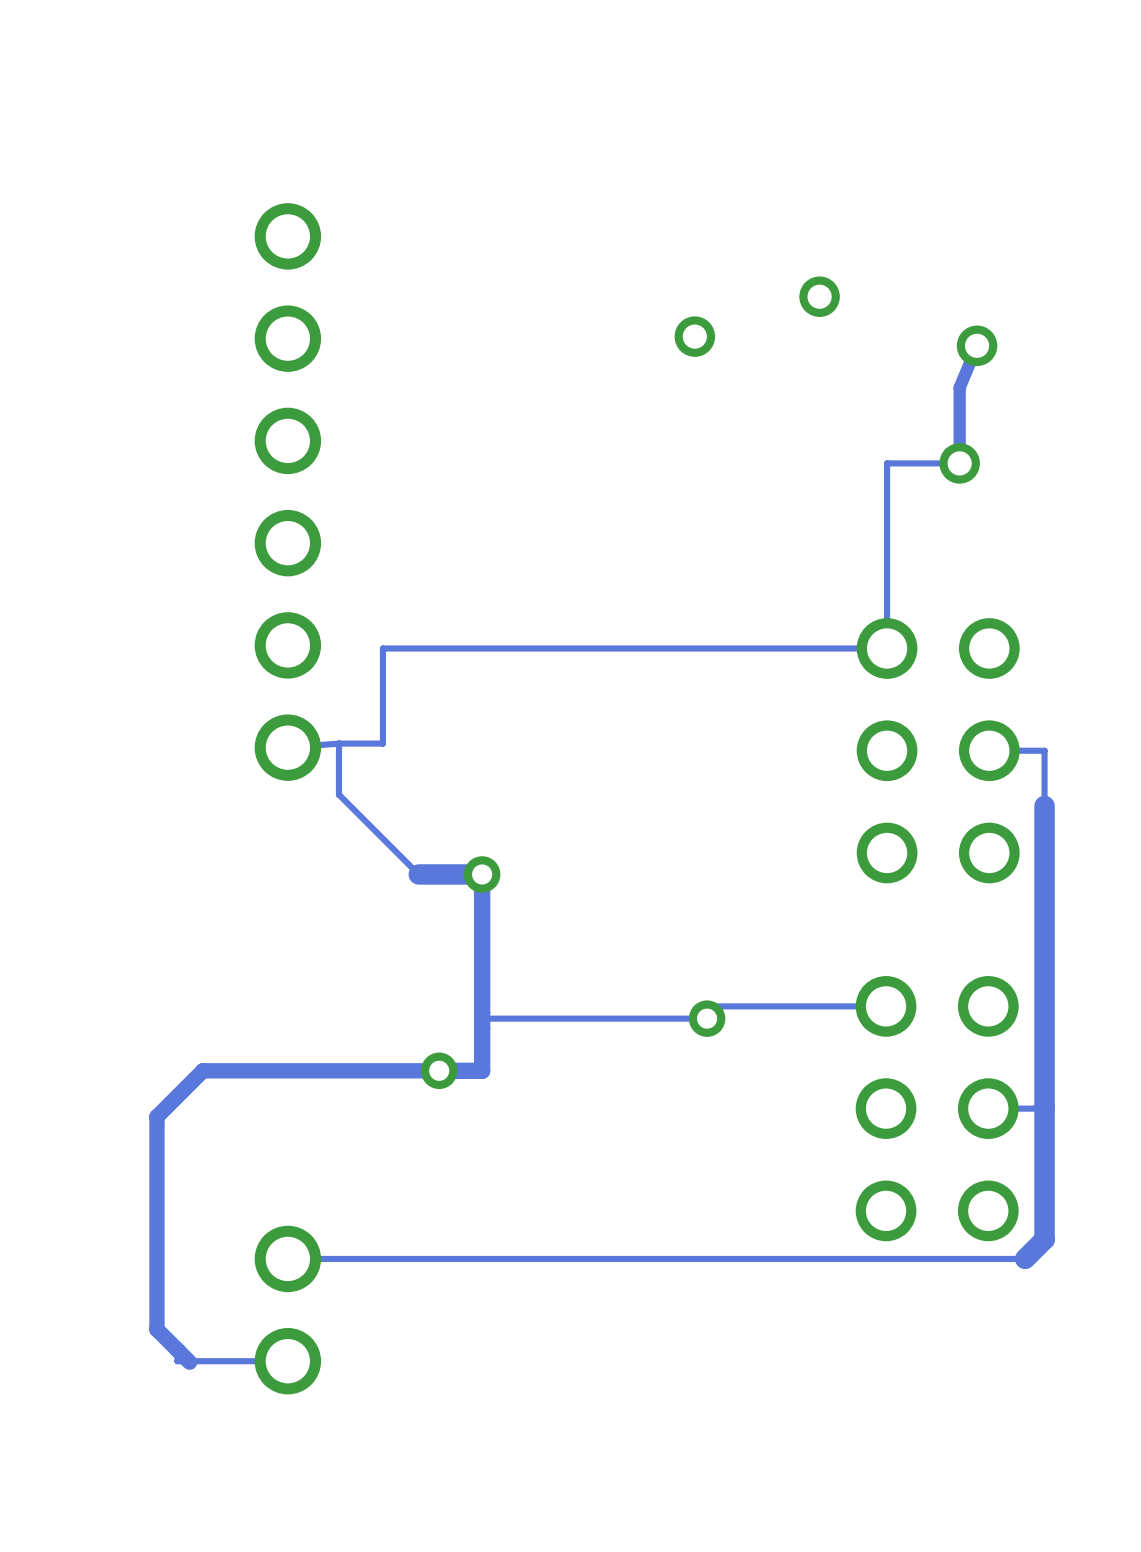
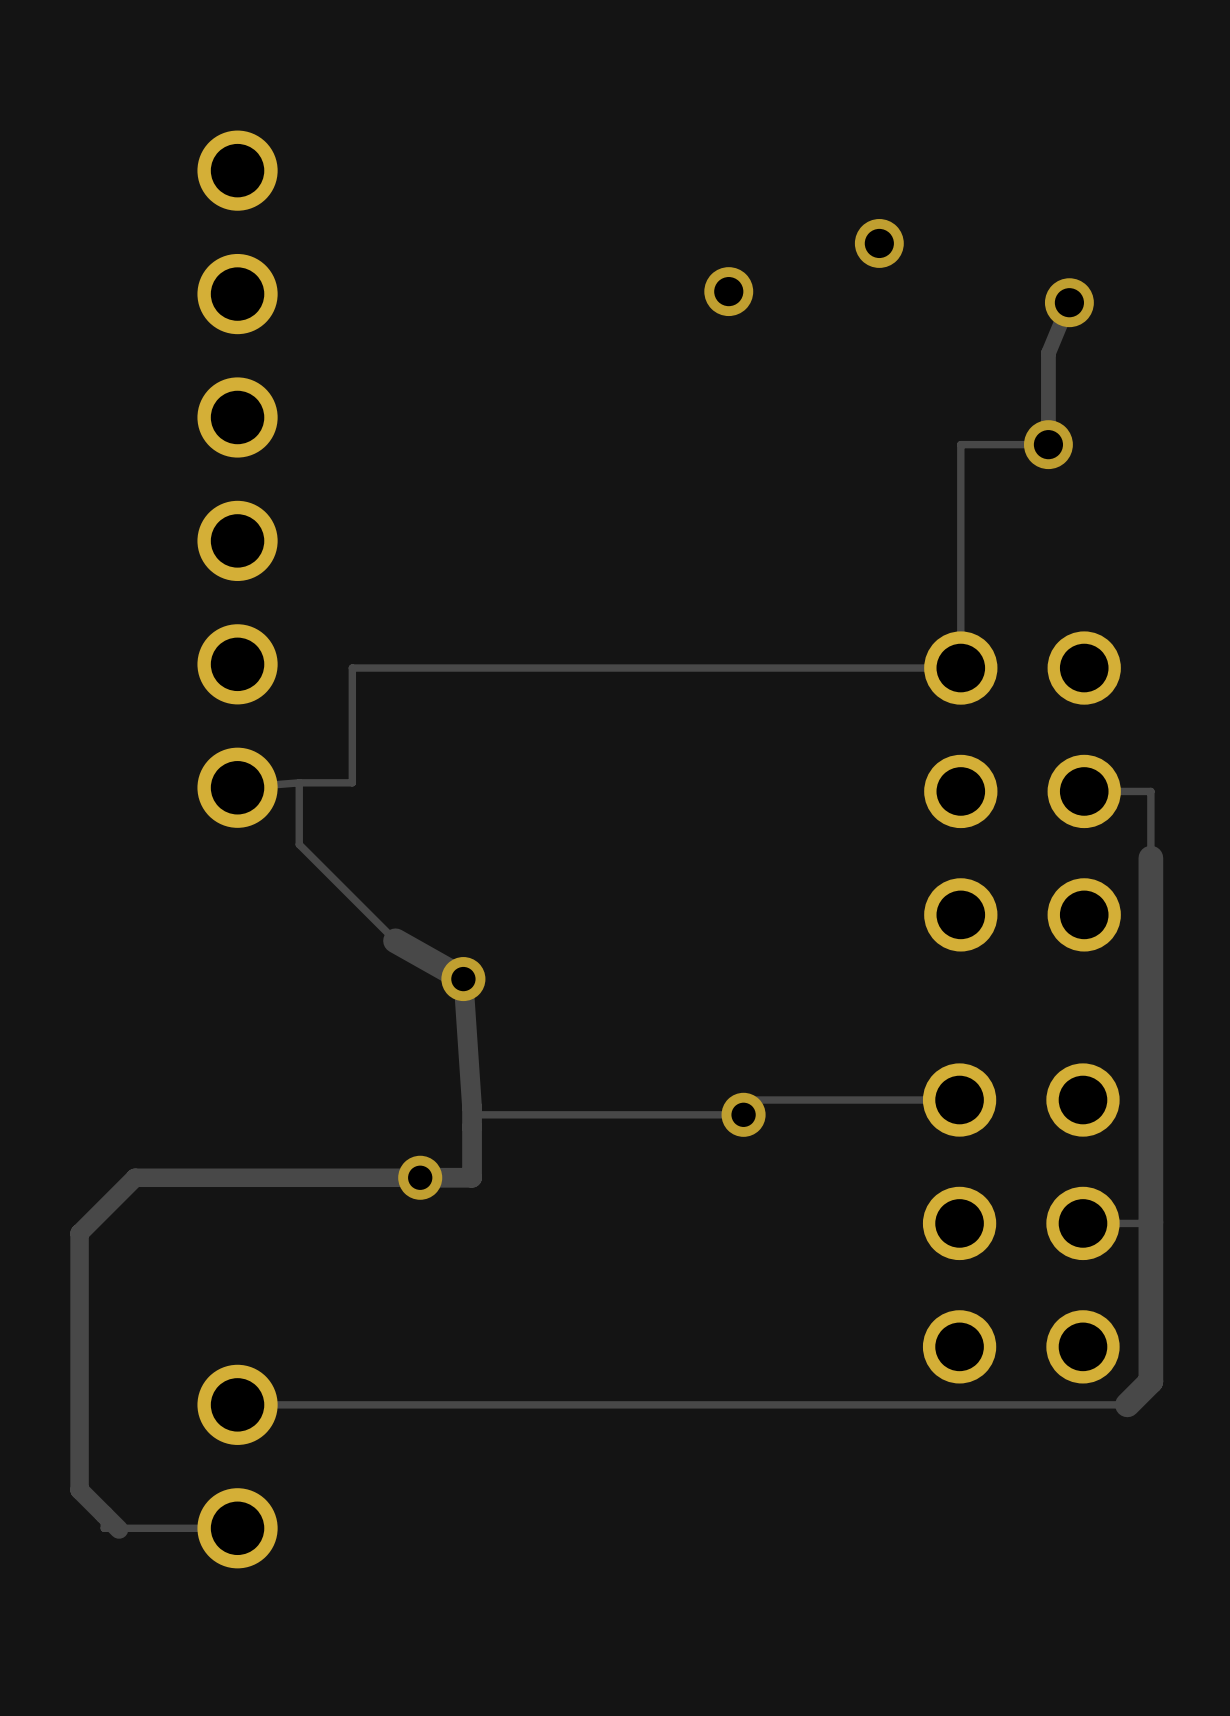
track: (418, 874) (482, 874) (482, 1012) -> (395, 940) (463, 979) (472, 1107)
via position: (482, 874) -> (463, 979)

